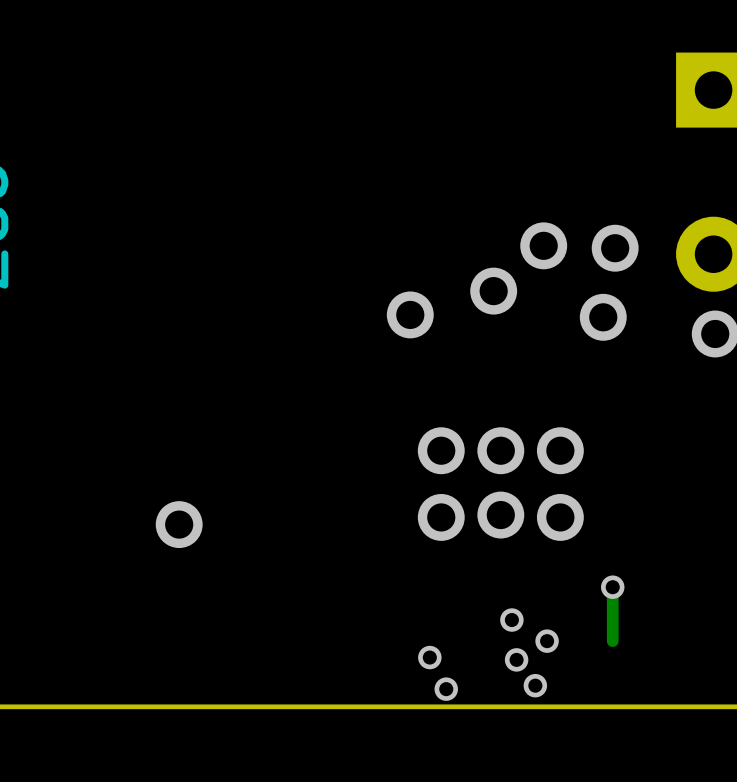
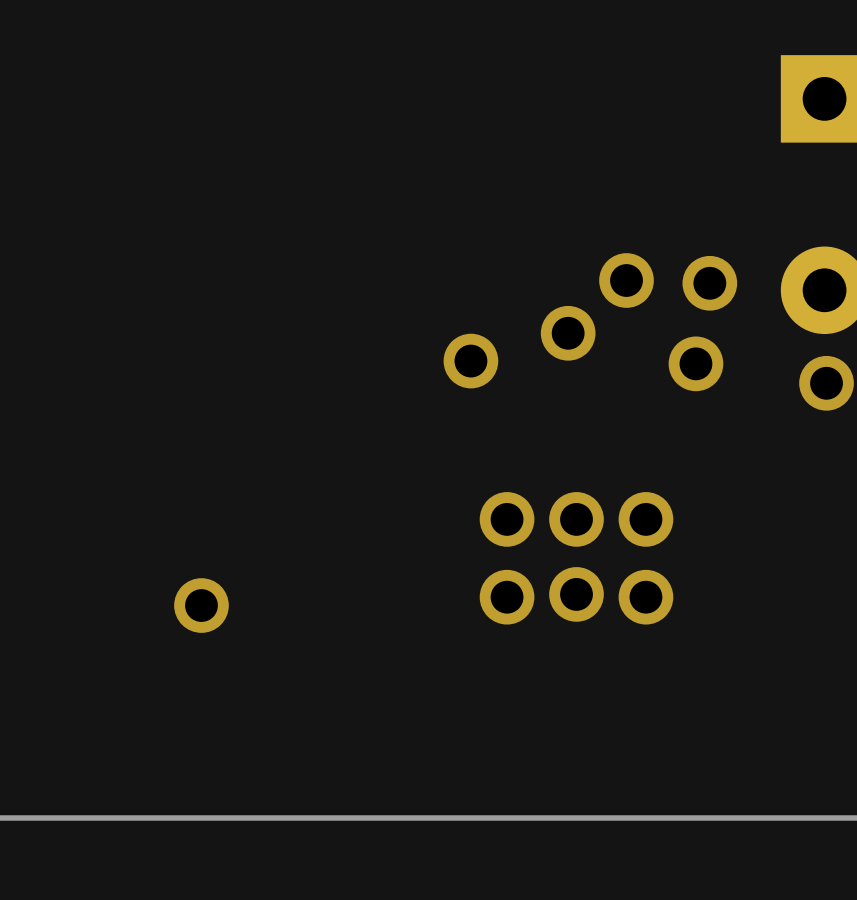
track: (612, 587) (612, 641) -> none
via: (612, 587) -> none
via: (511, 620) -> none
via: (547, 641) -> none
via: (429, 657) -> none
via: (516, 659) -> none
via: (535, 685) -> none
via: (446, 689) -> none

